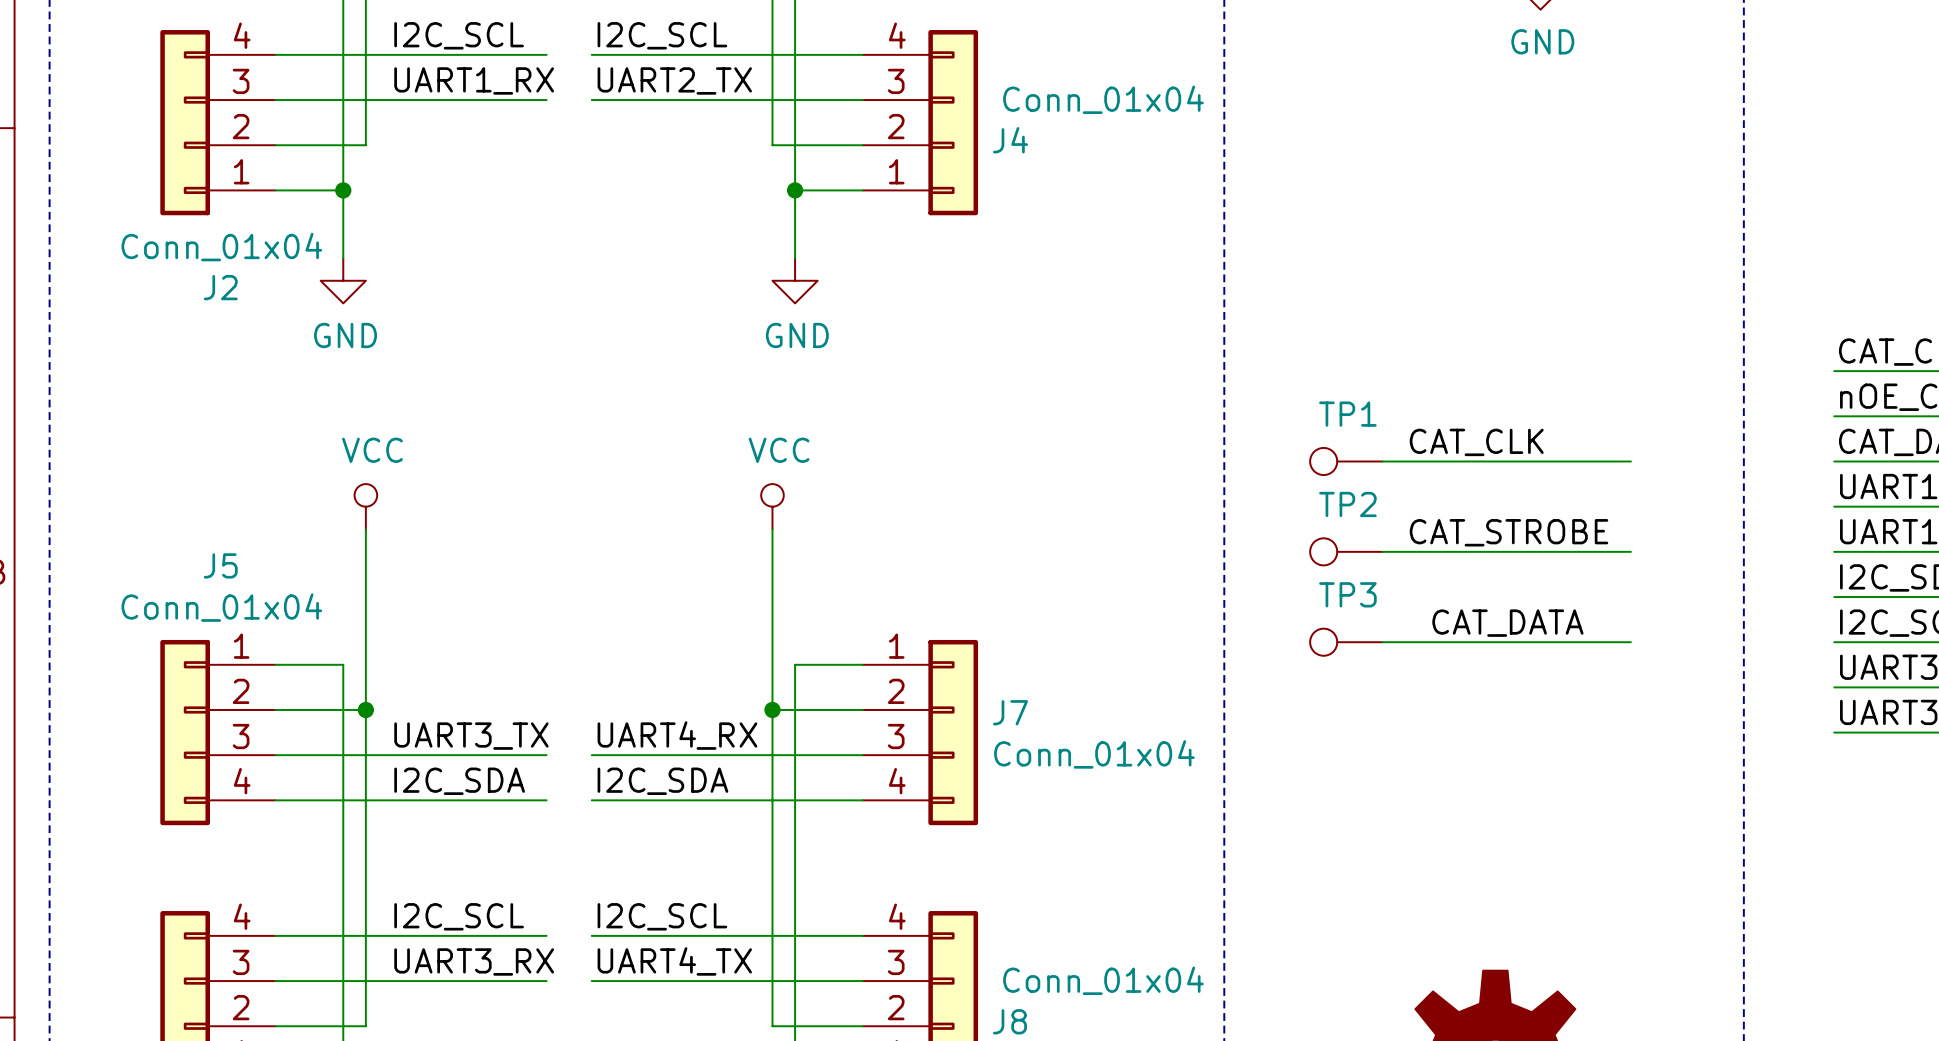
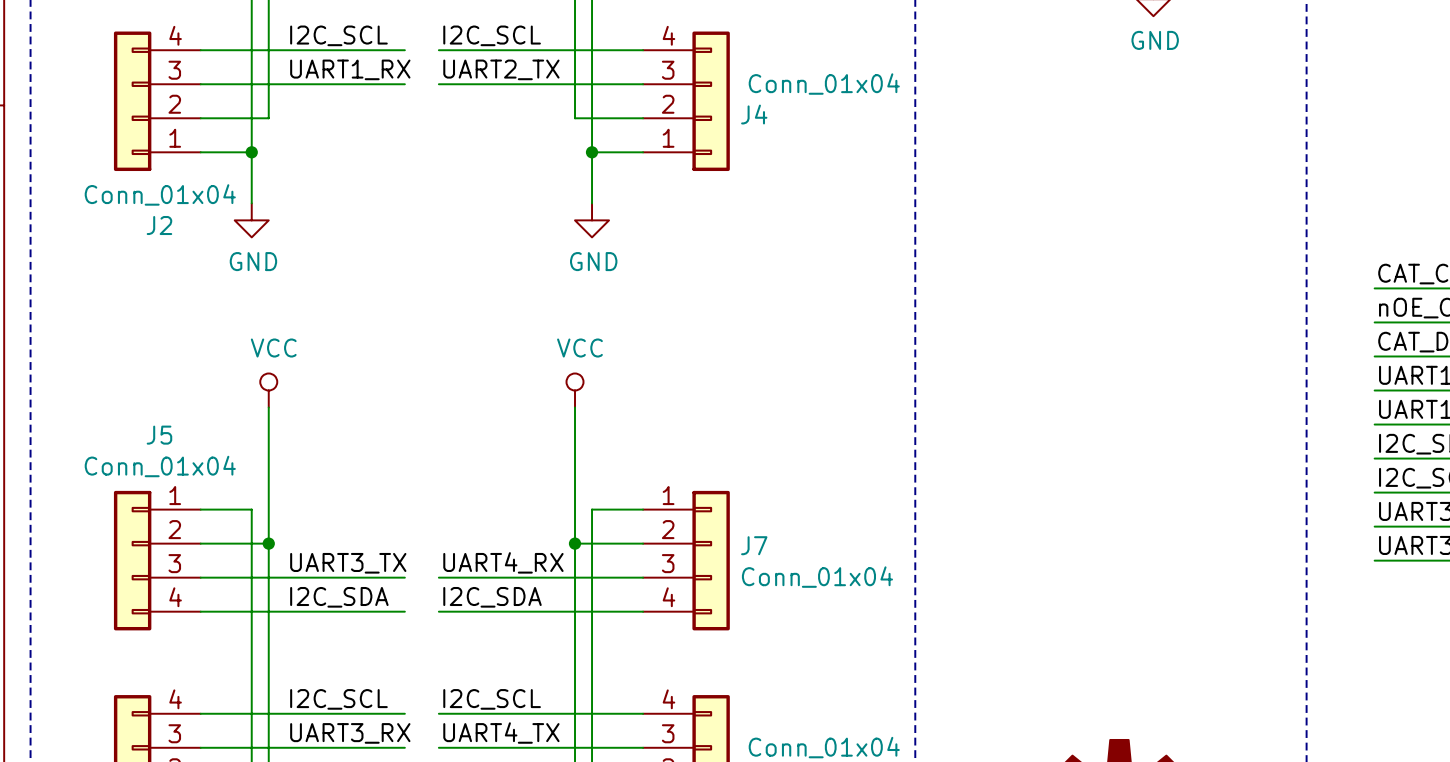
label: CAT_CLK (1476, 442) -> none
TP1: (1346, 461) -> none
wire: (1382, 461) (1630, 461) -> none
label: CAT_STROBE (1508, 532) -> none
TP2: (1346, 551) -> none
wire: (1382, 551) (1630, 551) -> none
label: CAT_DATA (1507, 623) -> none
TP3: (1346, 642) -> none
wire: (1382, 642) (1630, 642) -> none

